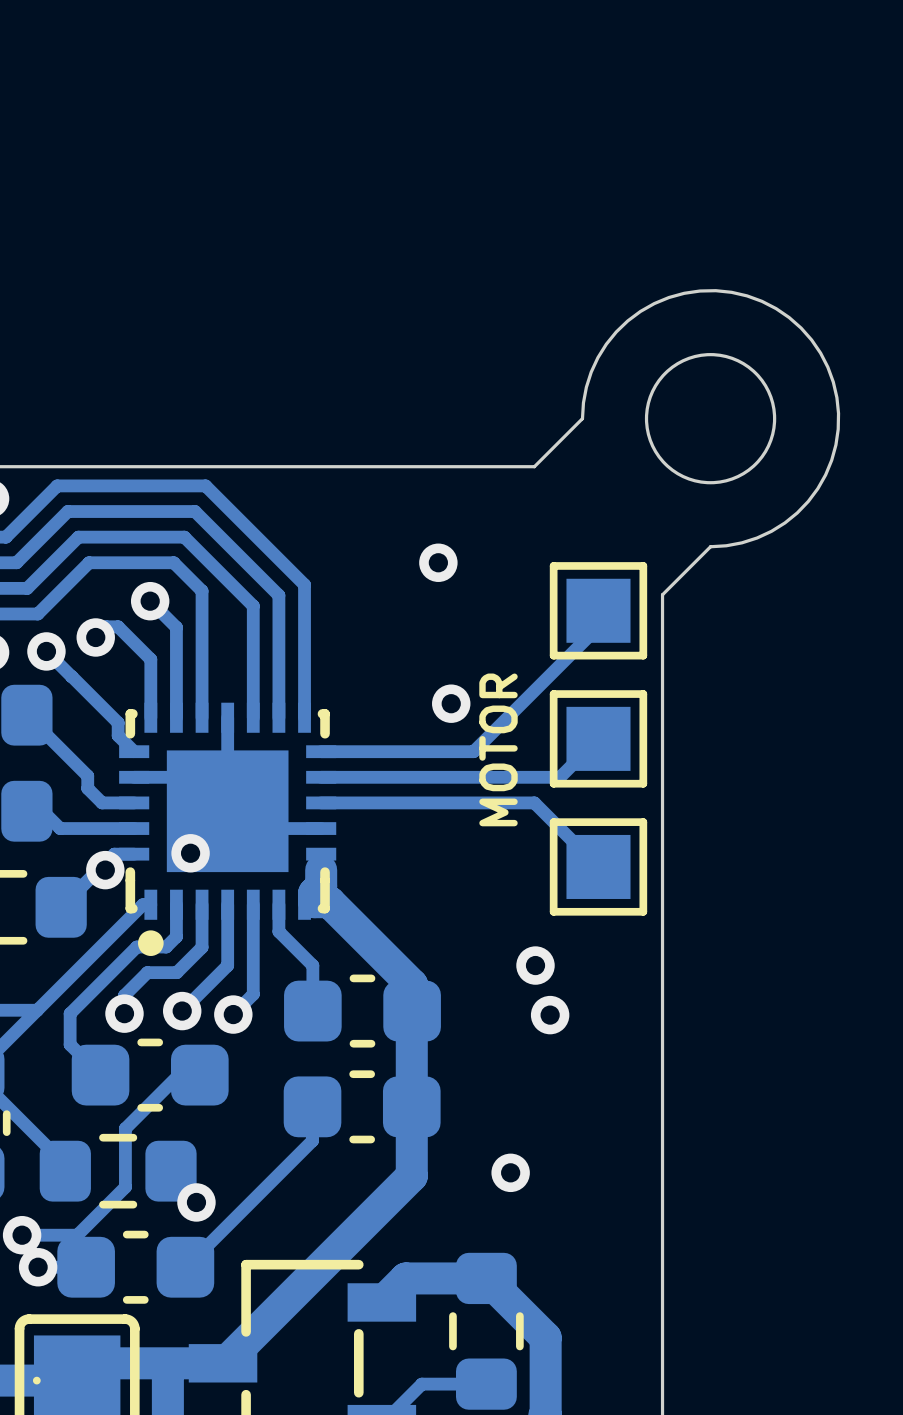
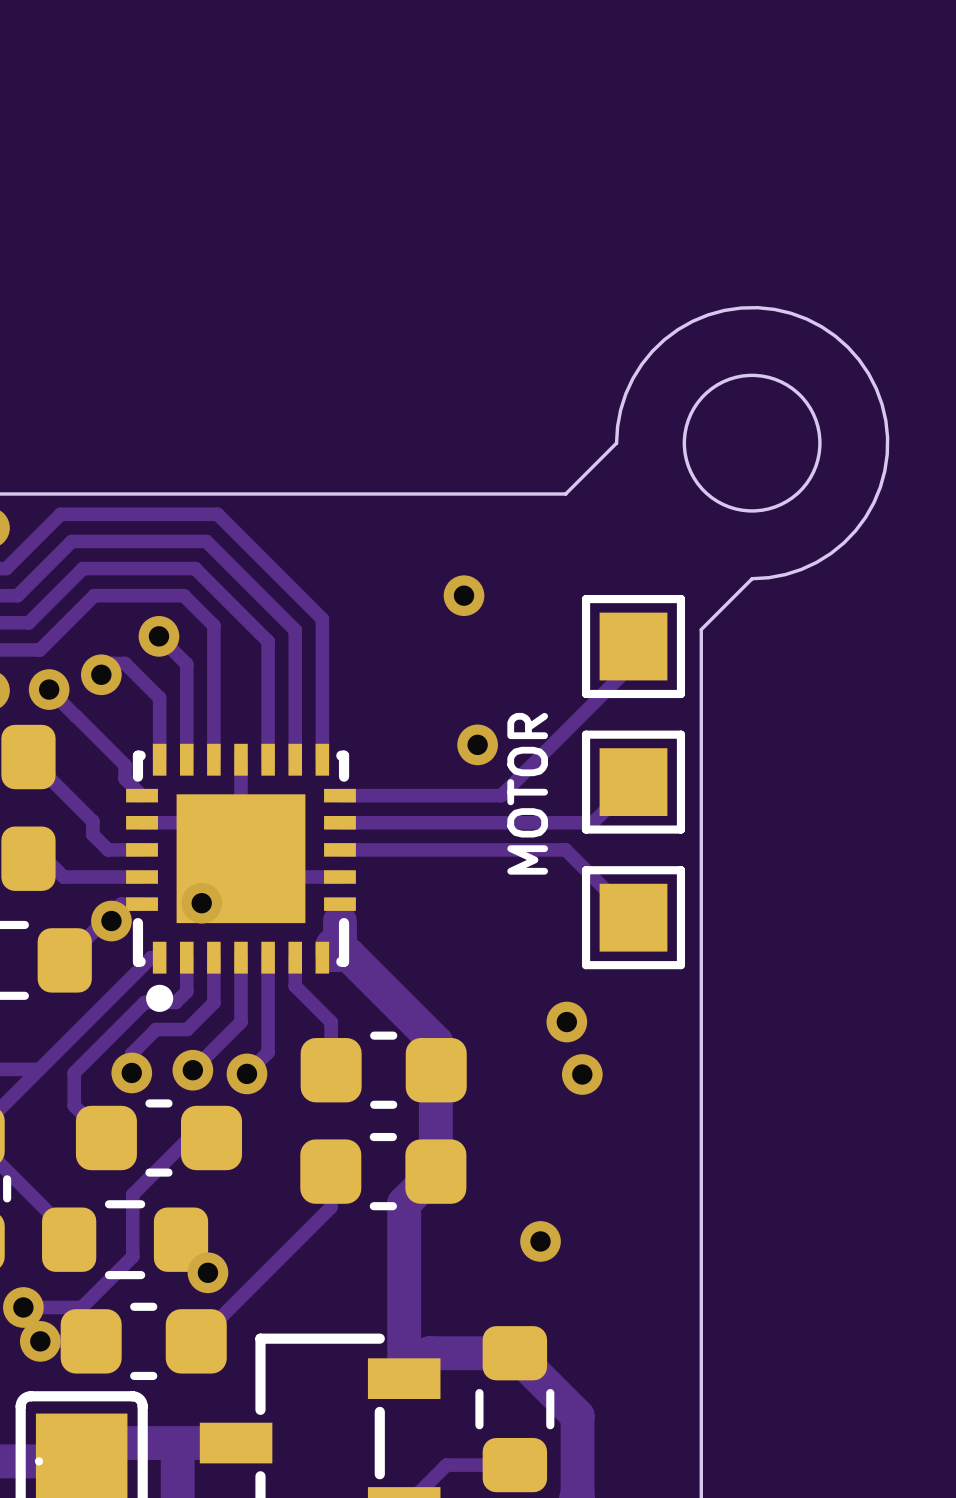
track: (411, 1106) (411, 1176) (224, 1363) -> (435, 1171) (404, 1203) (404, 1378)

